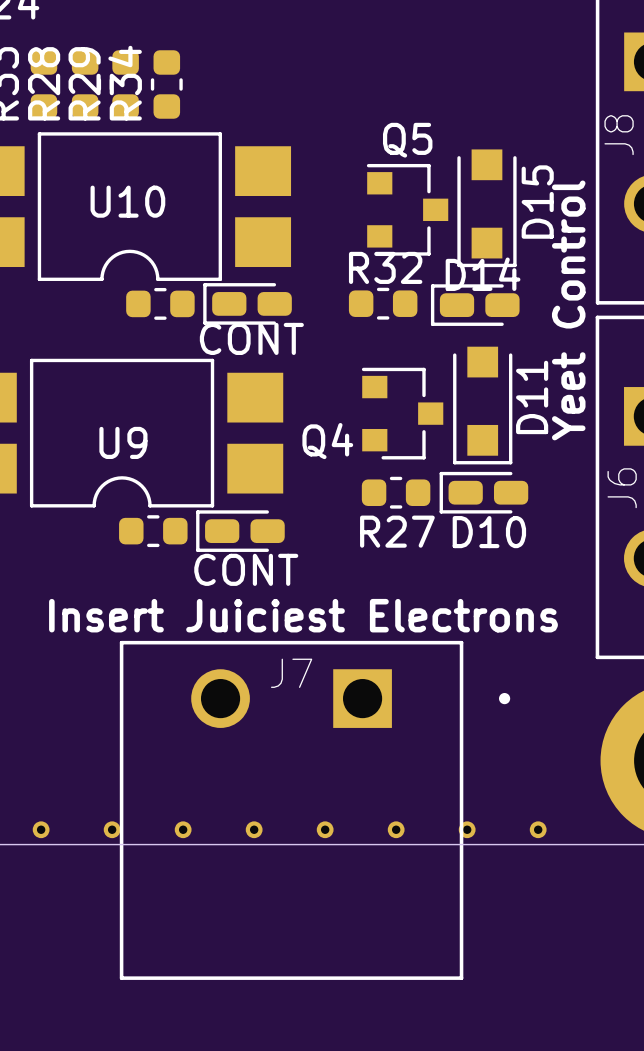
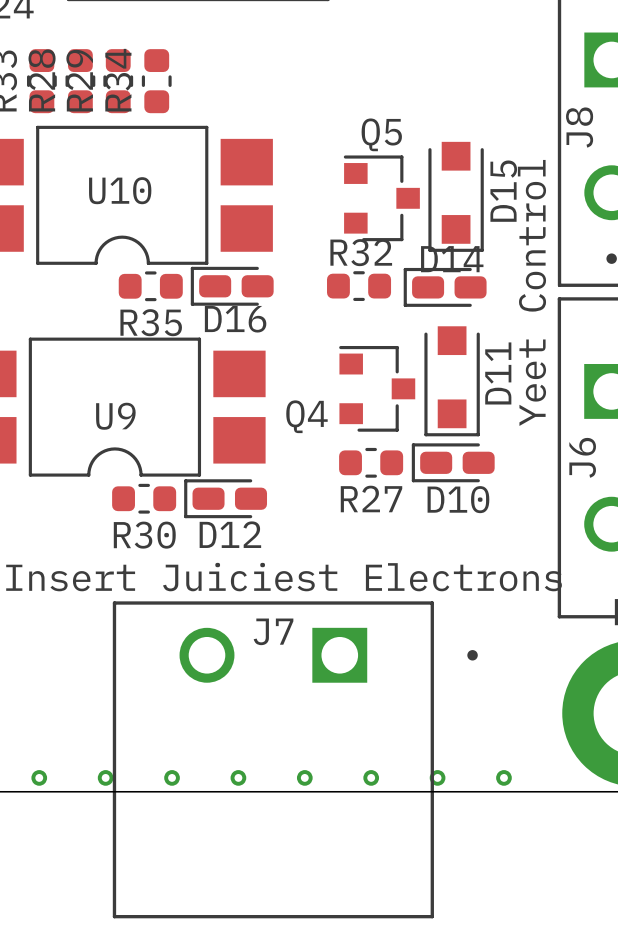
CONT name: CONT (251, 338) -> D16 (235, 319)
R35 name: none -> R35 (151, 322)
CONT name: CONT (246, 569) -> D12 (230, 534)
R30 name: none -> R30 (144, 535)

